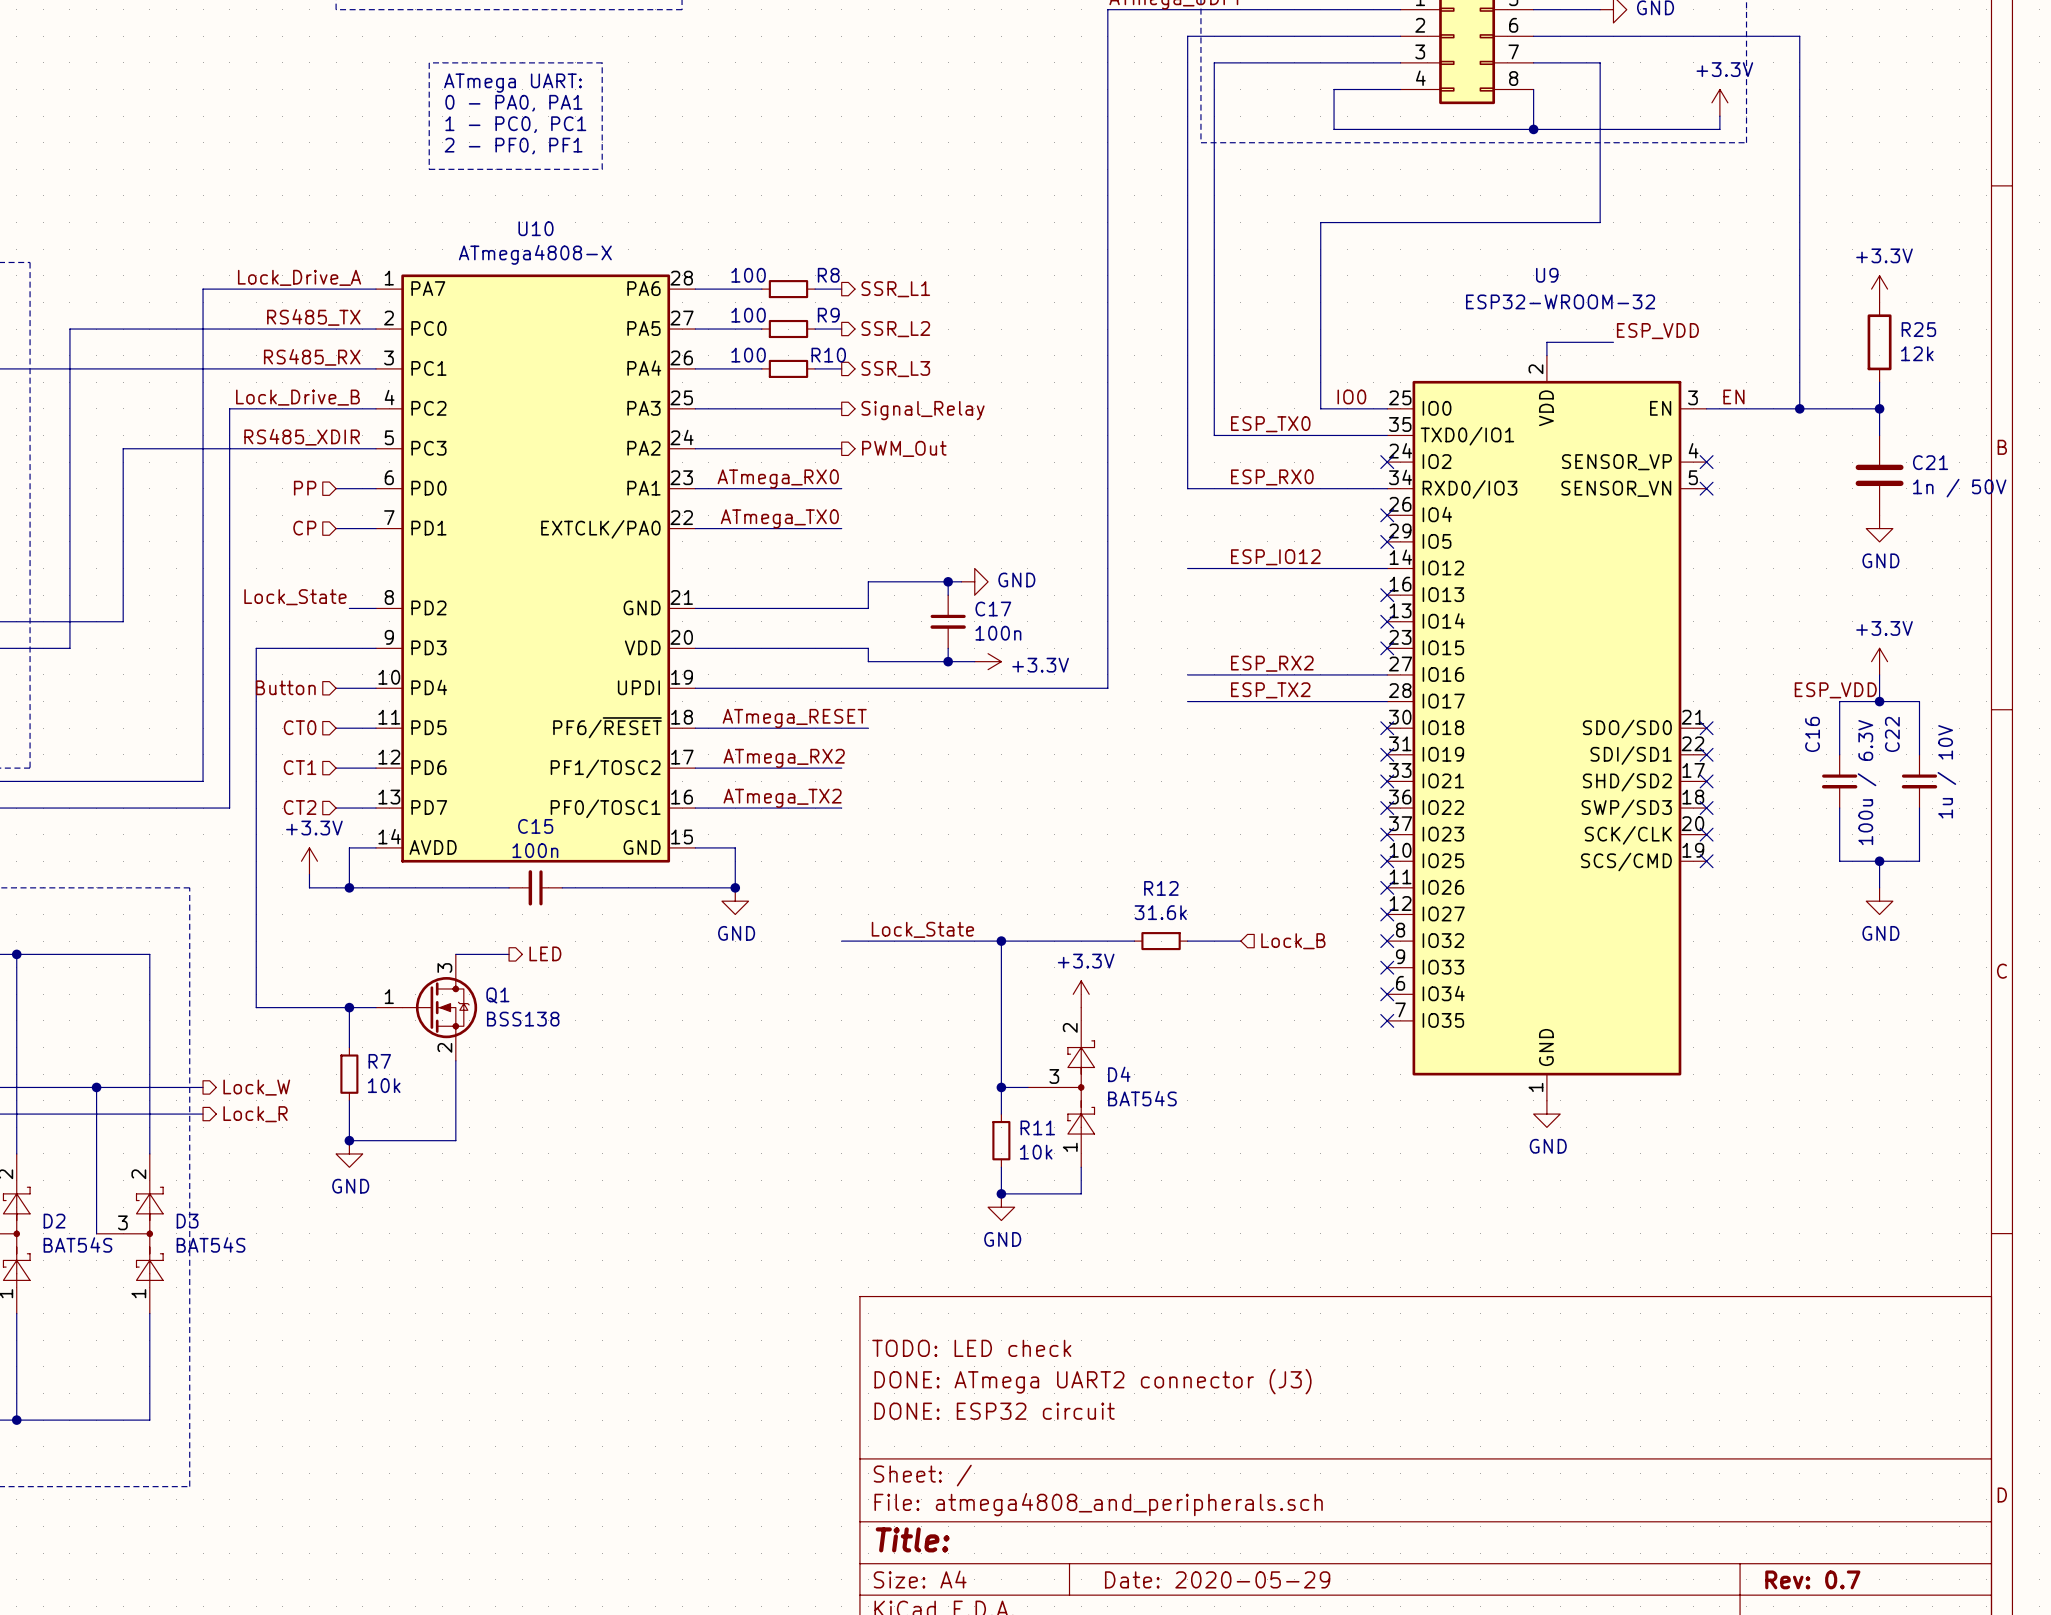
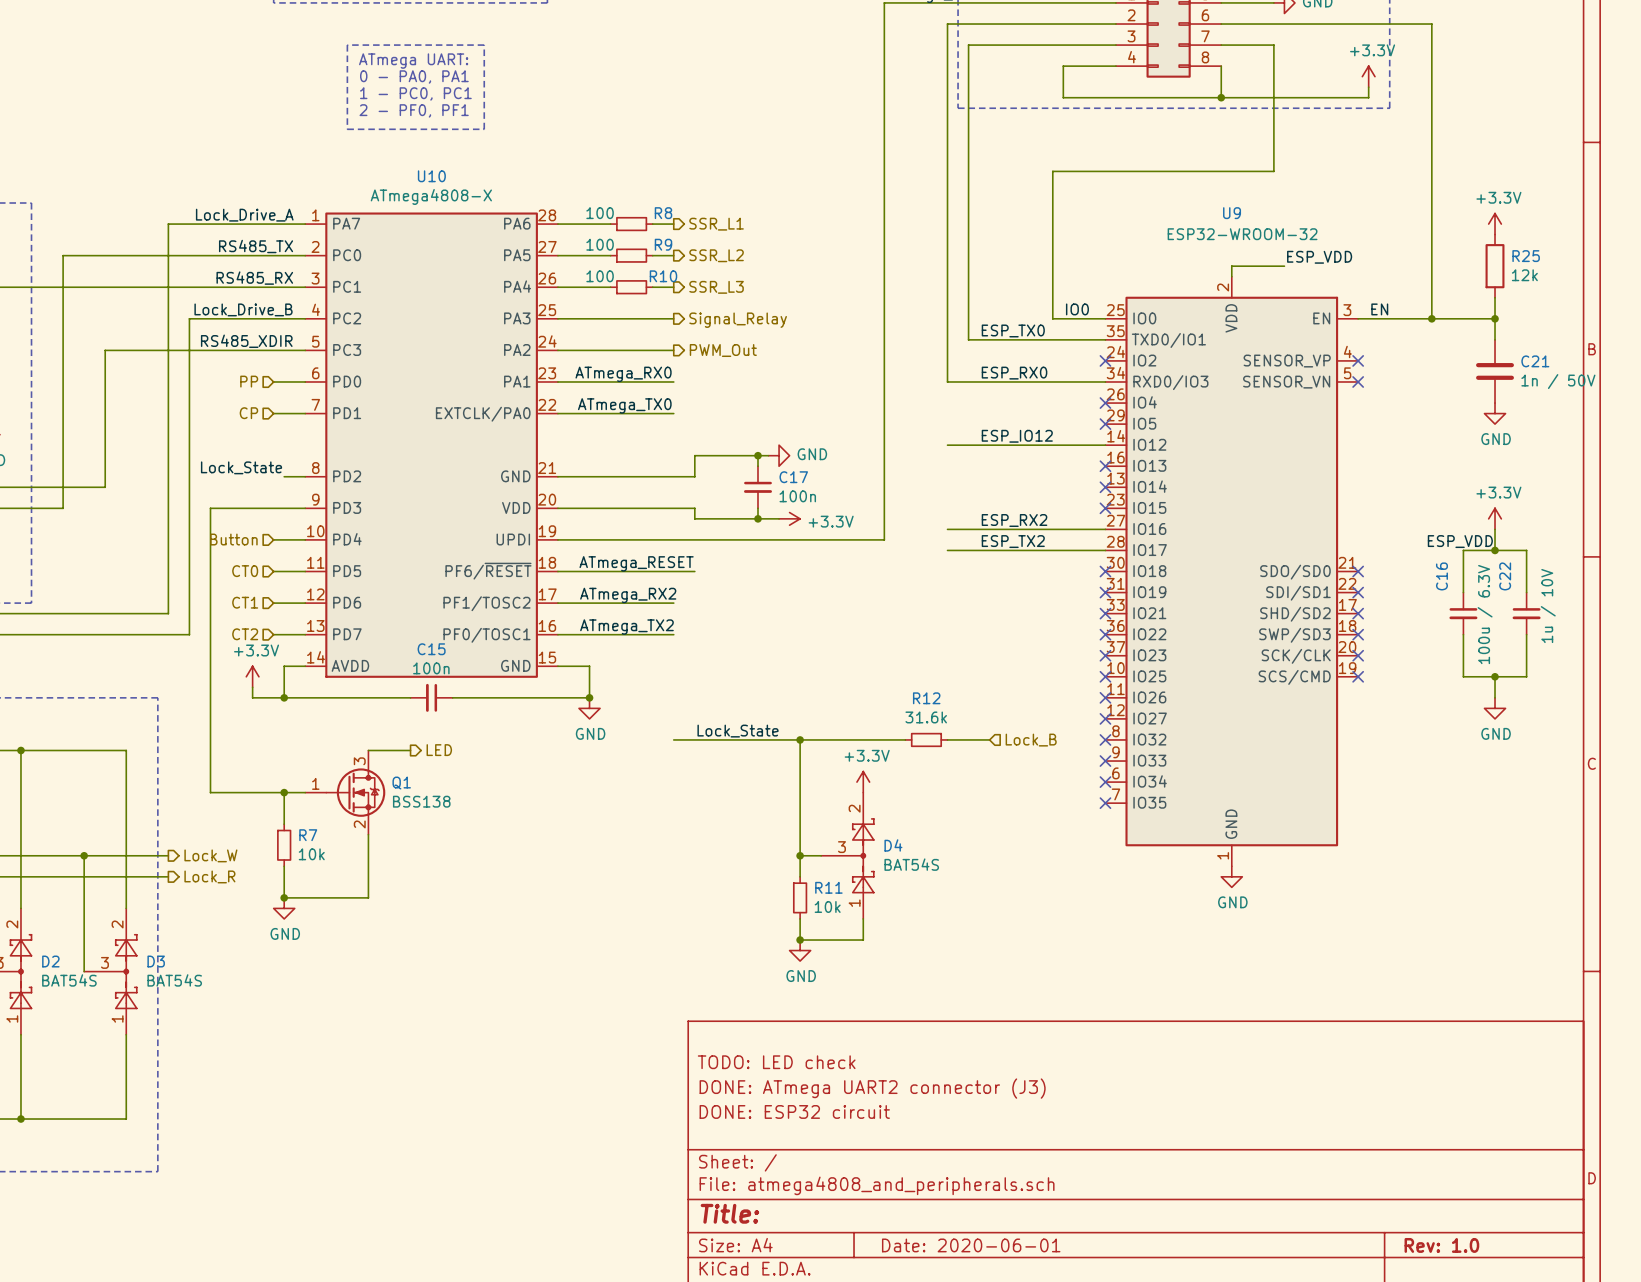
title block: Date: 2020-05-29 (1217, 1579) -> Date: 2020-06-01 (971, 1245)
title block: Rev: 0.7 (1812, 1579) -> Rev: 1.0 (1441, 1245)

